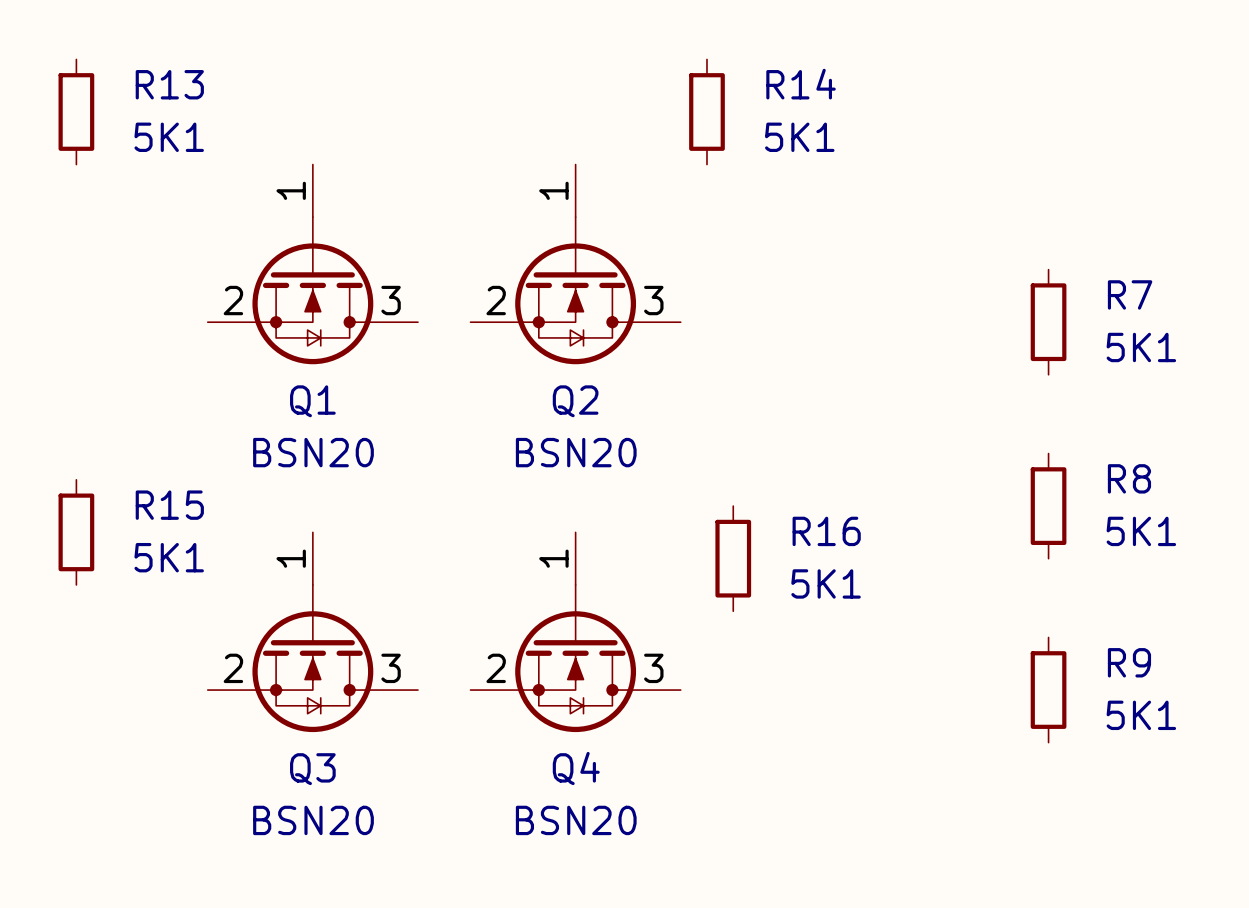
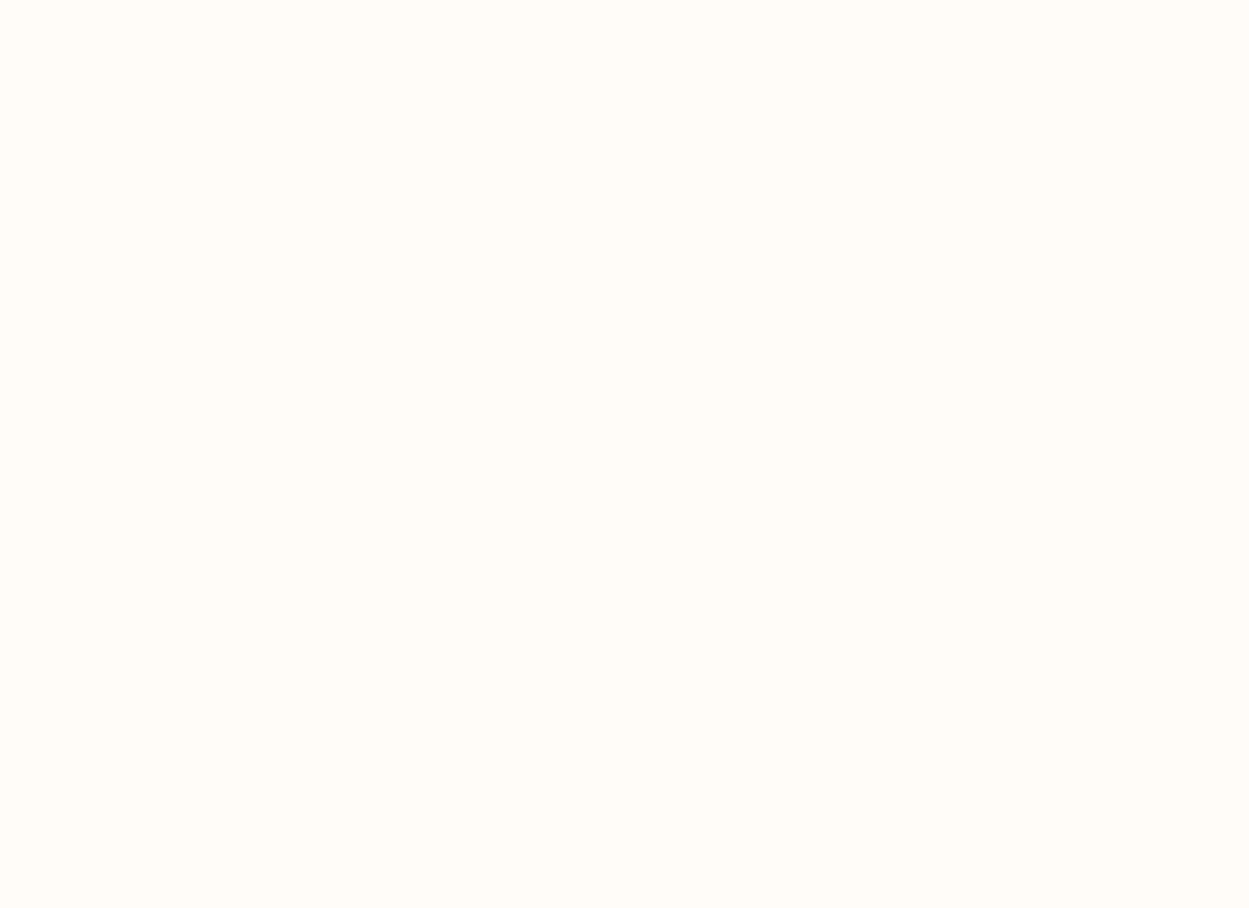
R13: 5K1 (76, 112) -> none
R14: 5K1 (706, 112) -> none
Q1: BSN20 (312, 264) -> none
Q2: BSN20 (575, 264) -> none
R7: 5K1 (1048, 322) -> none
R8: 5K1 (1048, 506) -> none
R15: 5K1 (76, 532) -> none
R16: 5K1 (733, 558) -> none
Q3: BSN20 (312, 632) -> none
Q4: BSN20 (575, 632) -> none
R9: 5K1 (1048, 690) -> none

